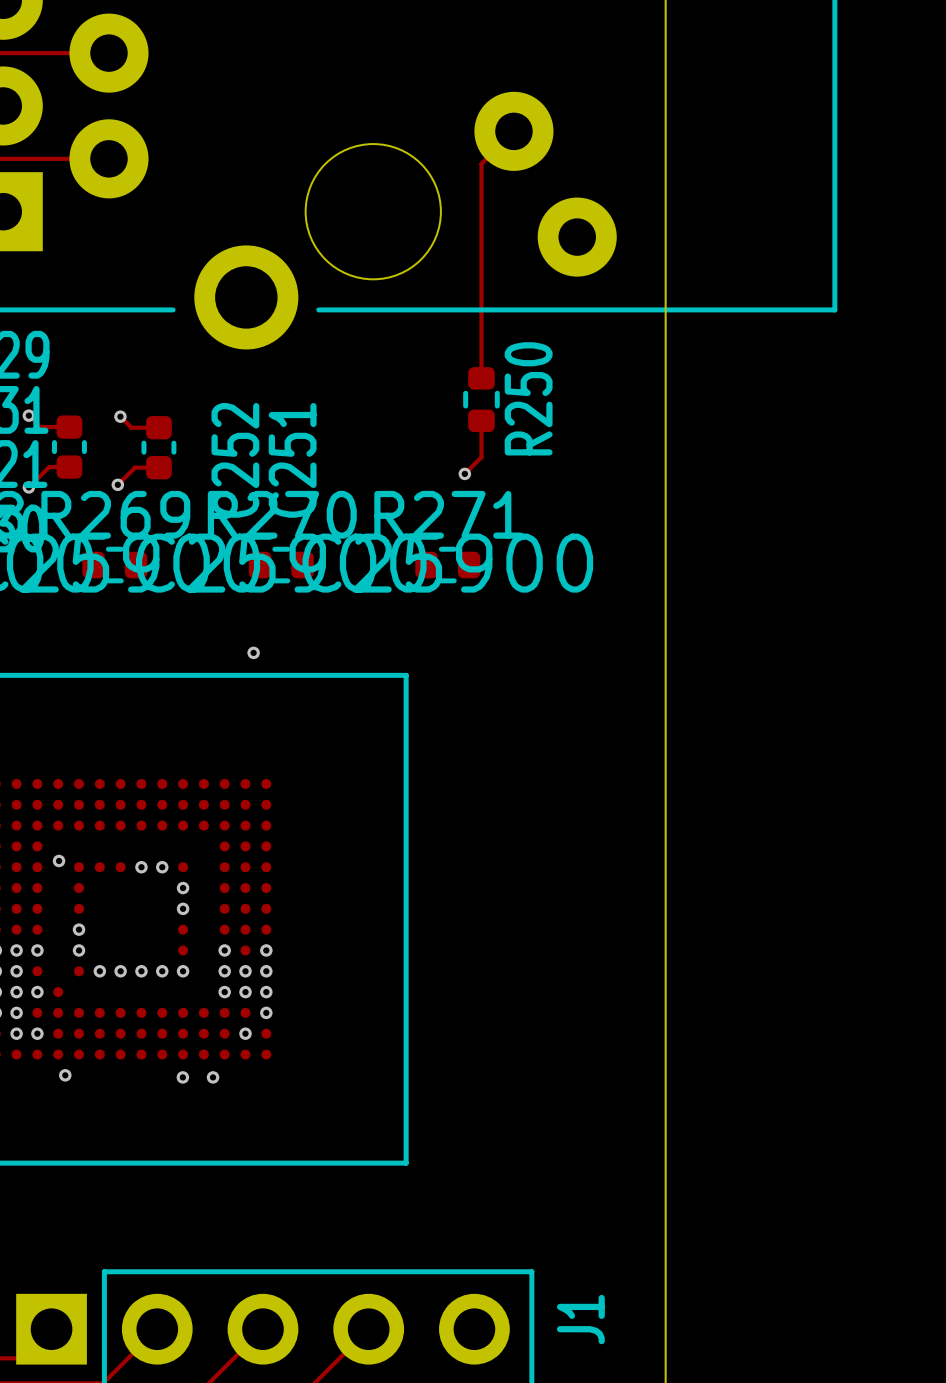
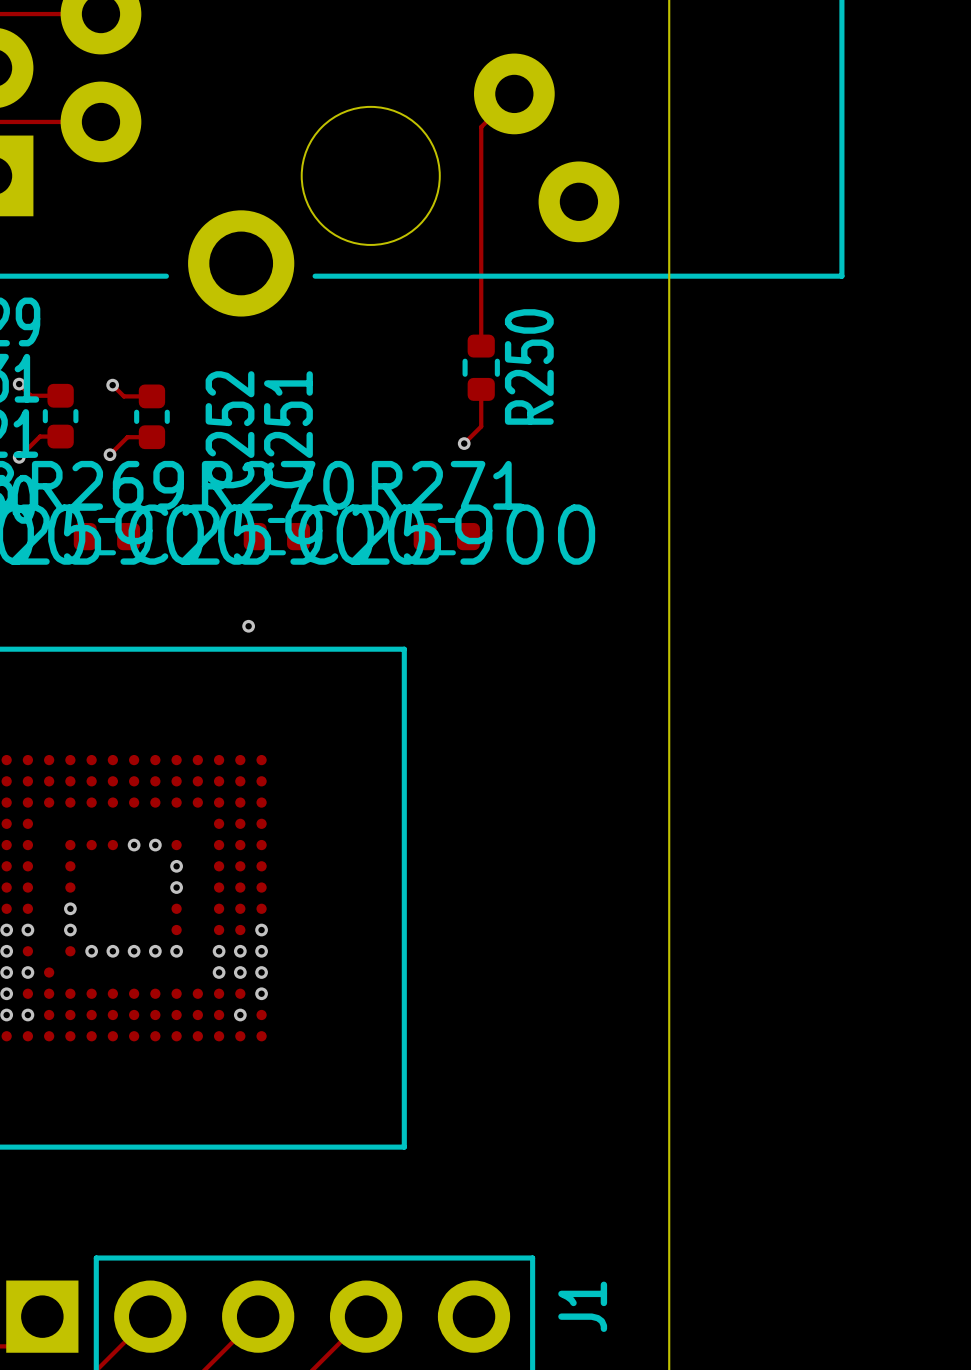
via: (59, 860) -> none
via: (224, 950) -> none
via: (65, 1075) -> none
via: (182, 1077) -> none
via: (213, 1077) -> none

